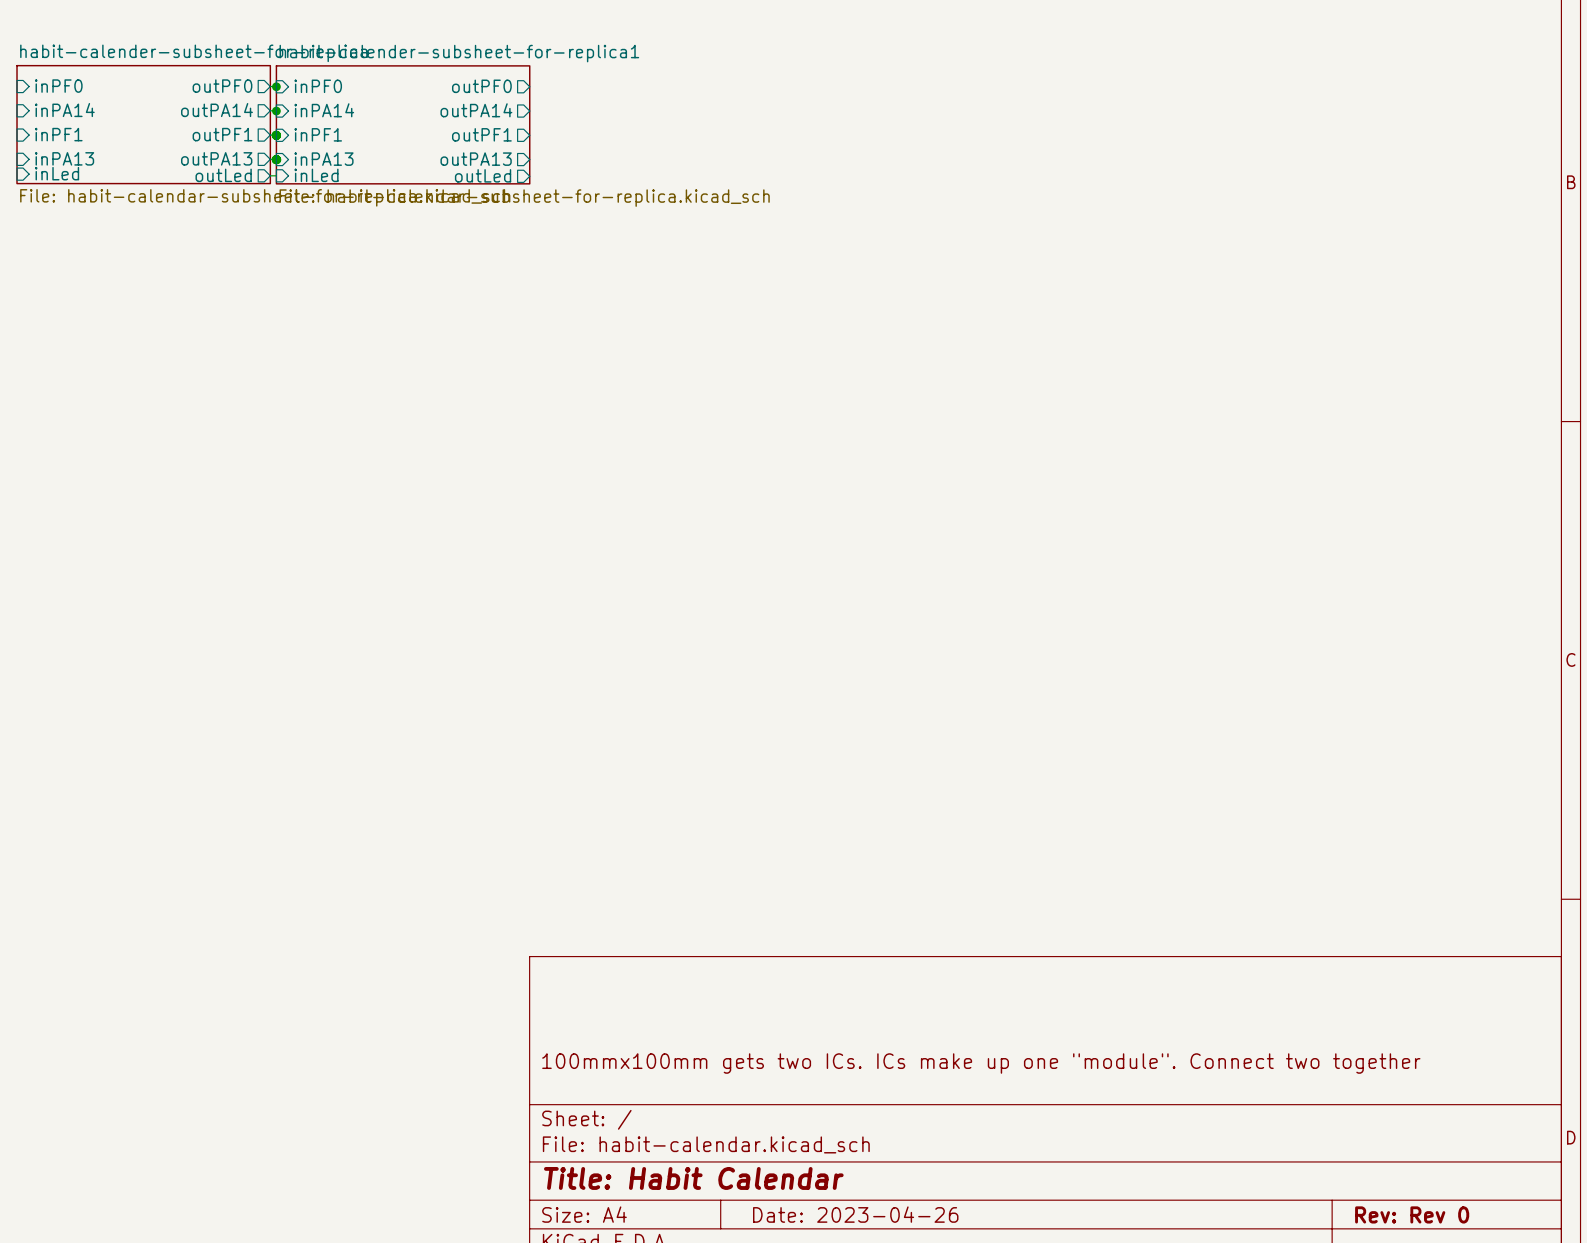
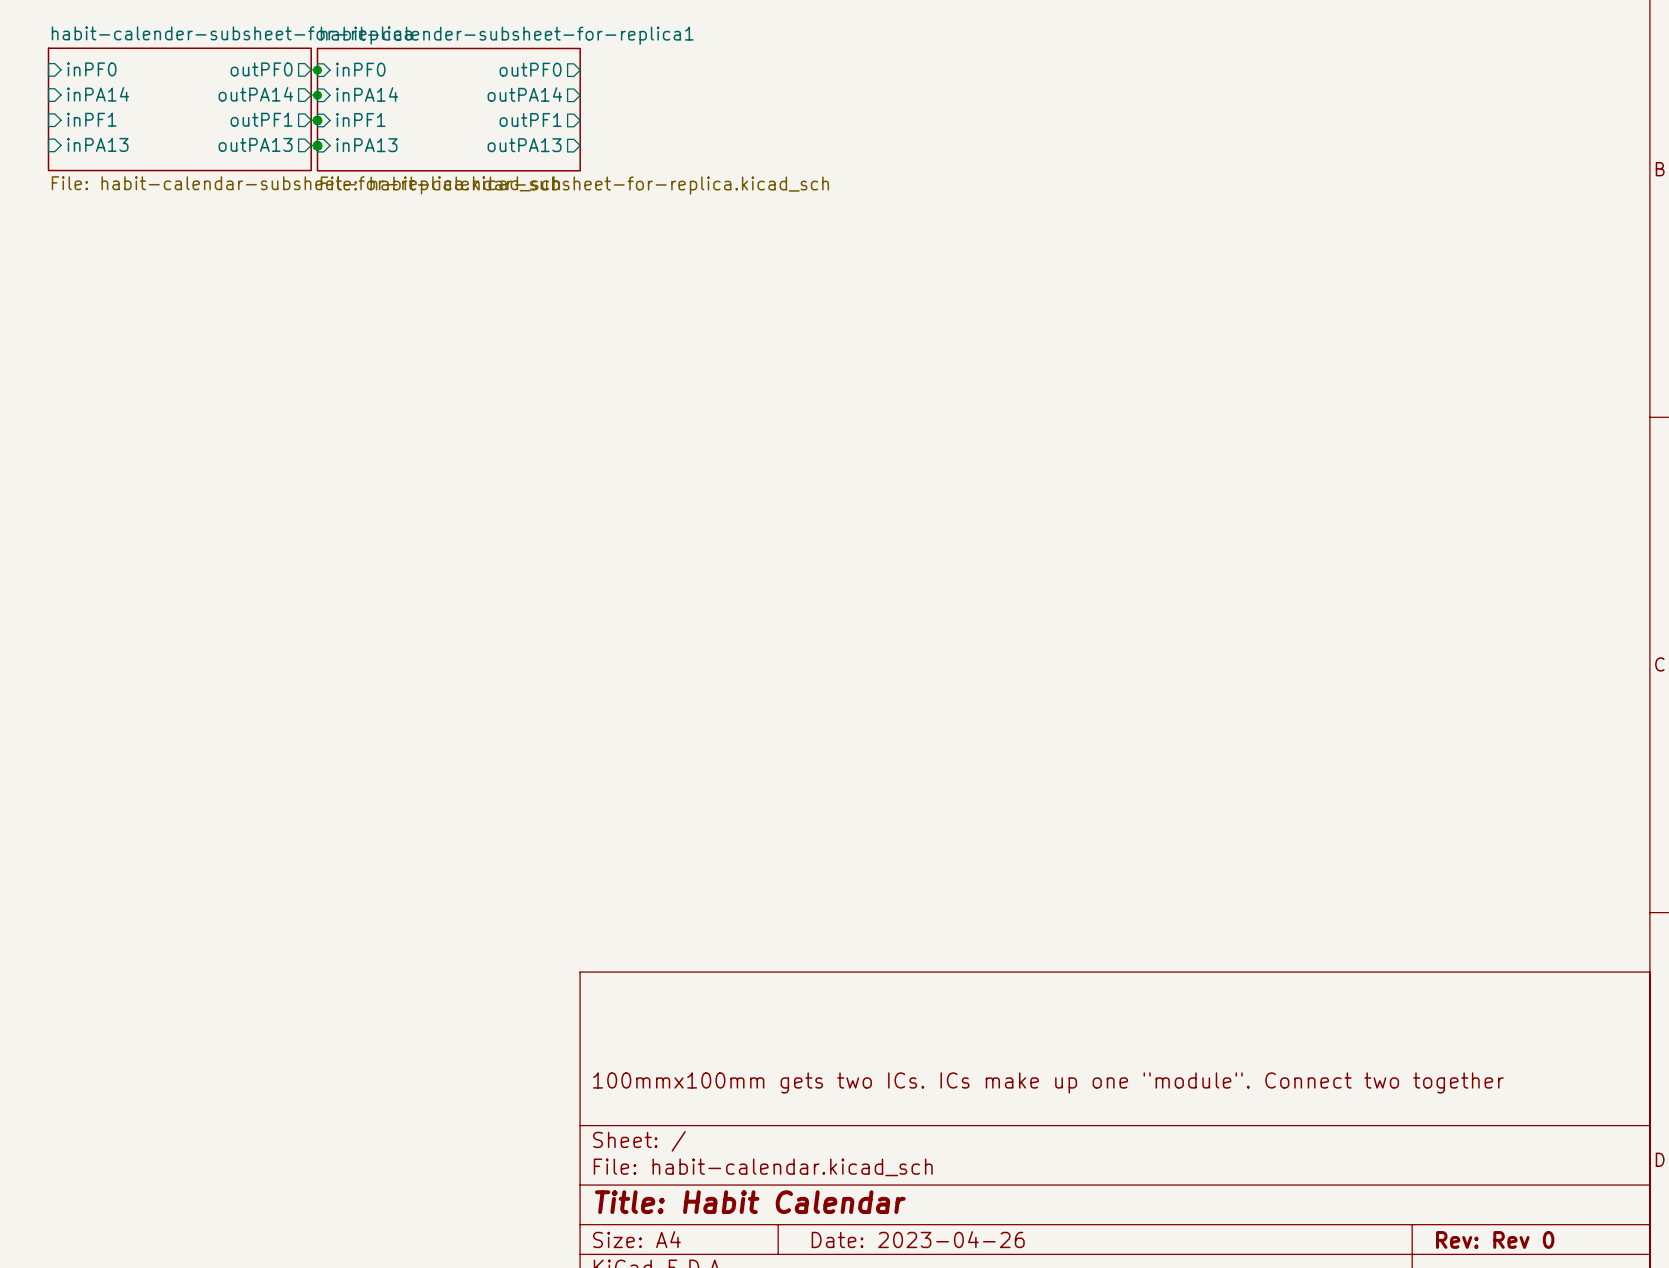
sheet pin: inLed (57, 173) -> none
sheet pin: outLed (223, 175) -> none
wire: (270, 175) (276, 175) -> none
sheet pin: inLed (316, 175) -> none
sheet pin: outLed (483, 175) -> none

